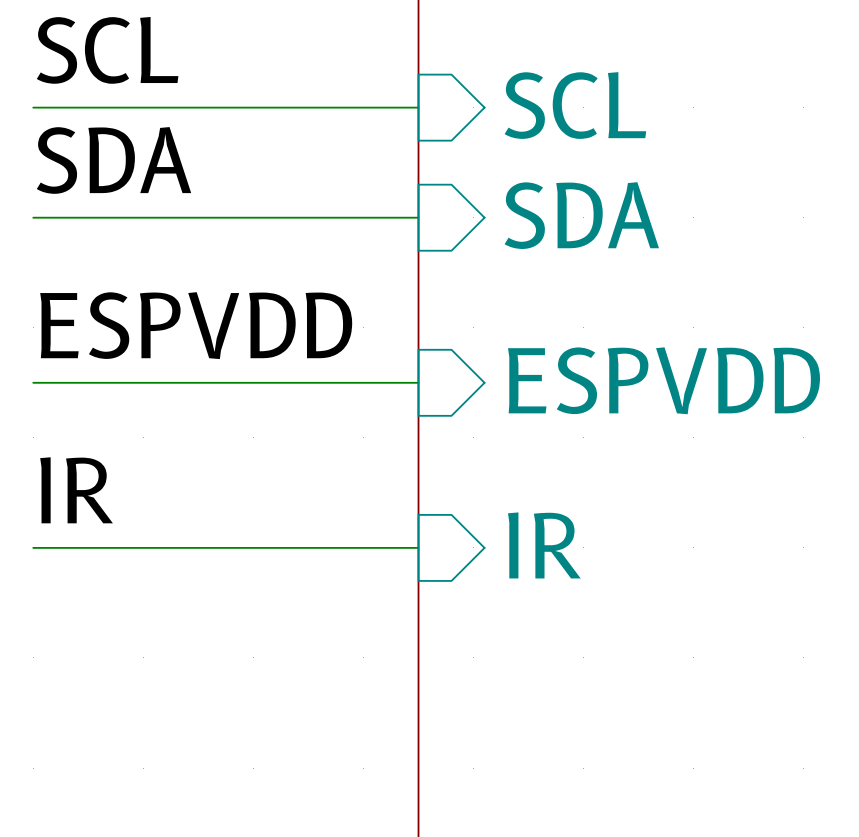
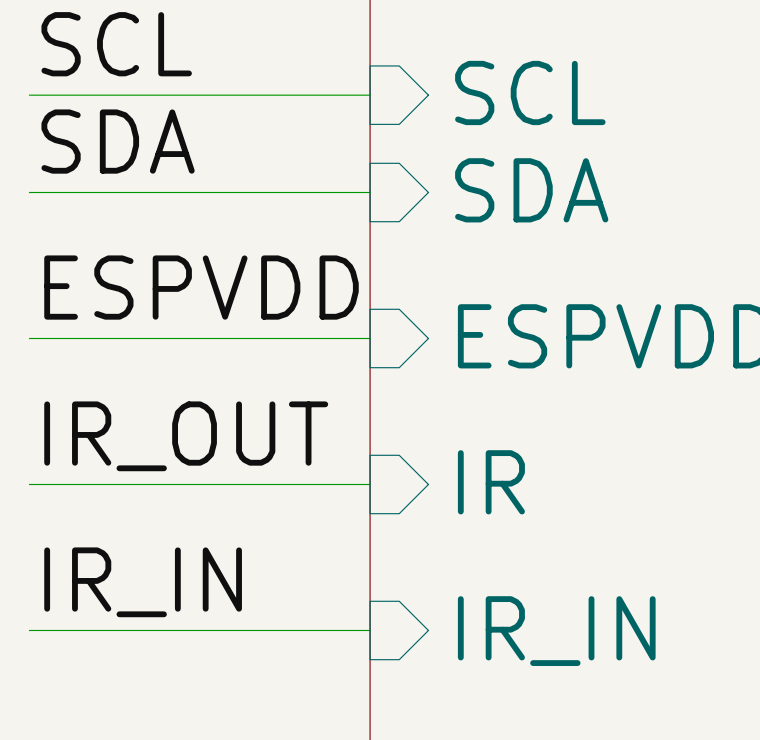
label: IR (76, 490) -> IR_OUT (186, 436)
label: none -> IR_IN (143, 582)
wire: none -> (29, 630) (370, 630)
sheet pin: none -> IR_IN (556, 631)

